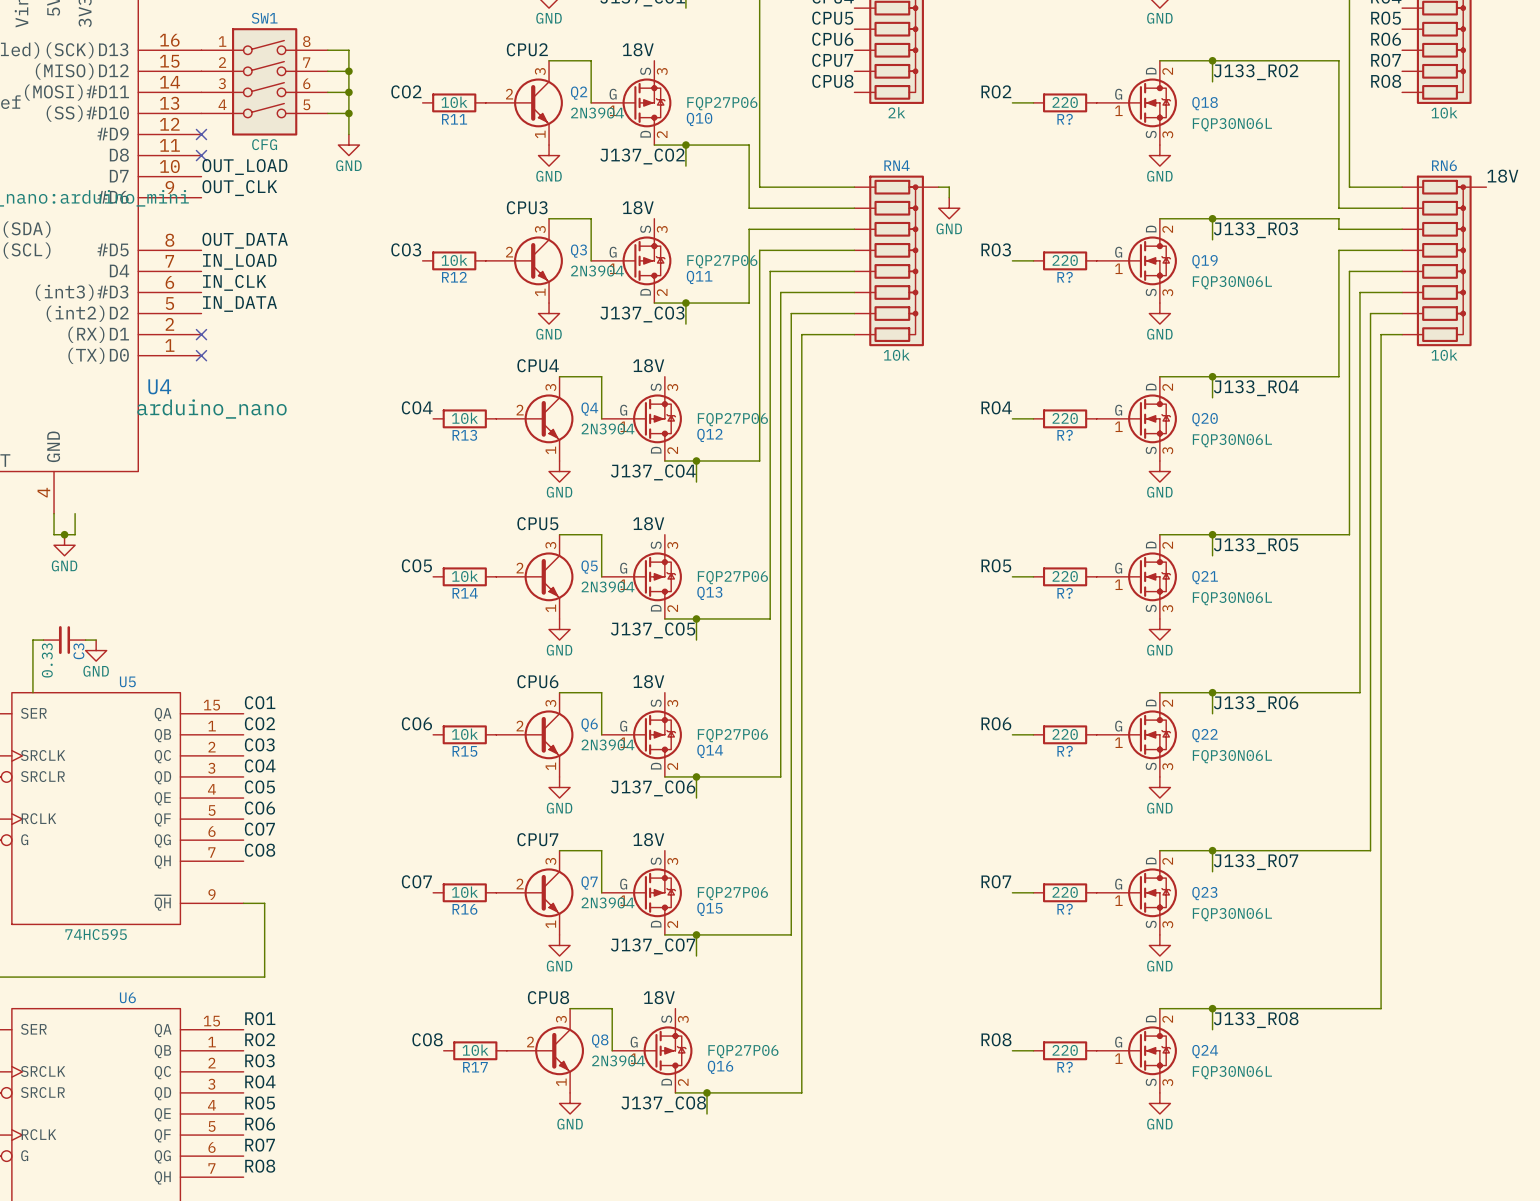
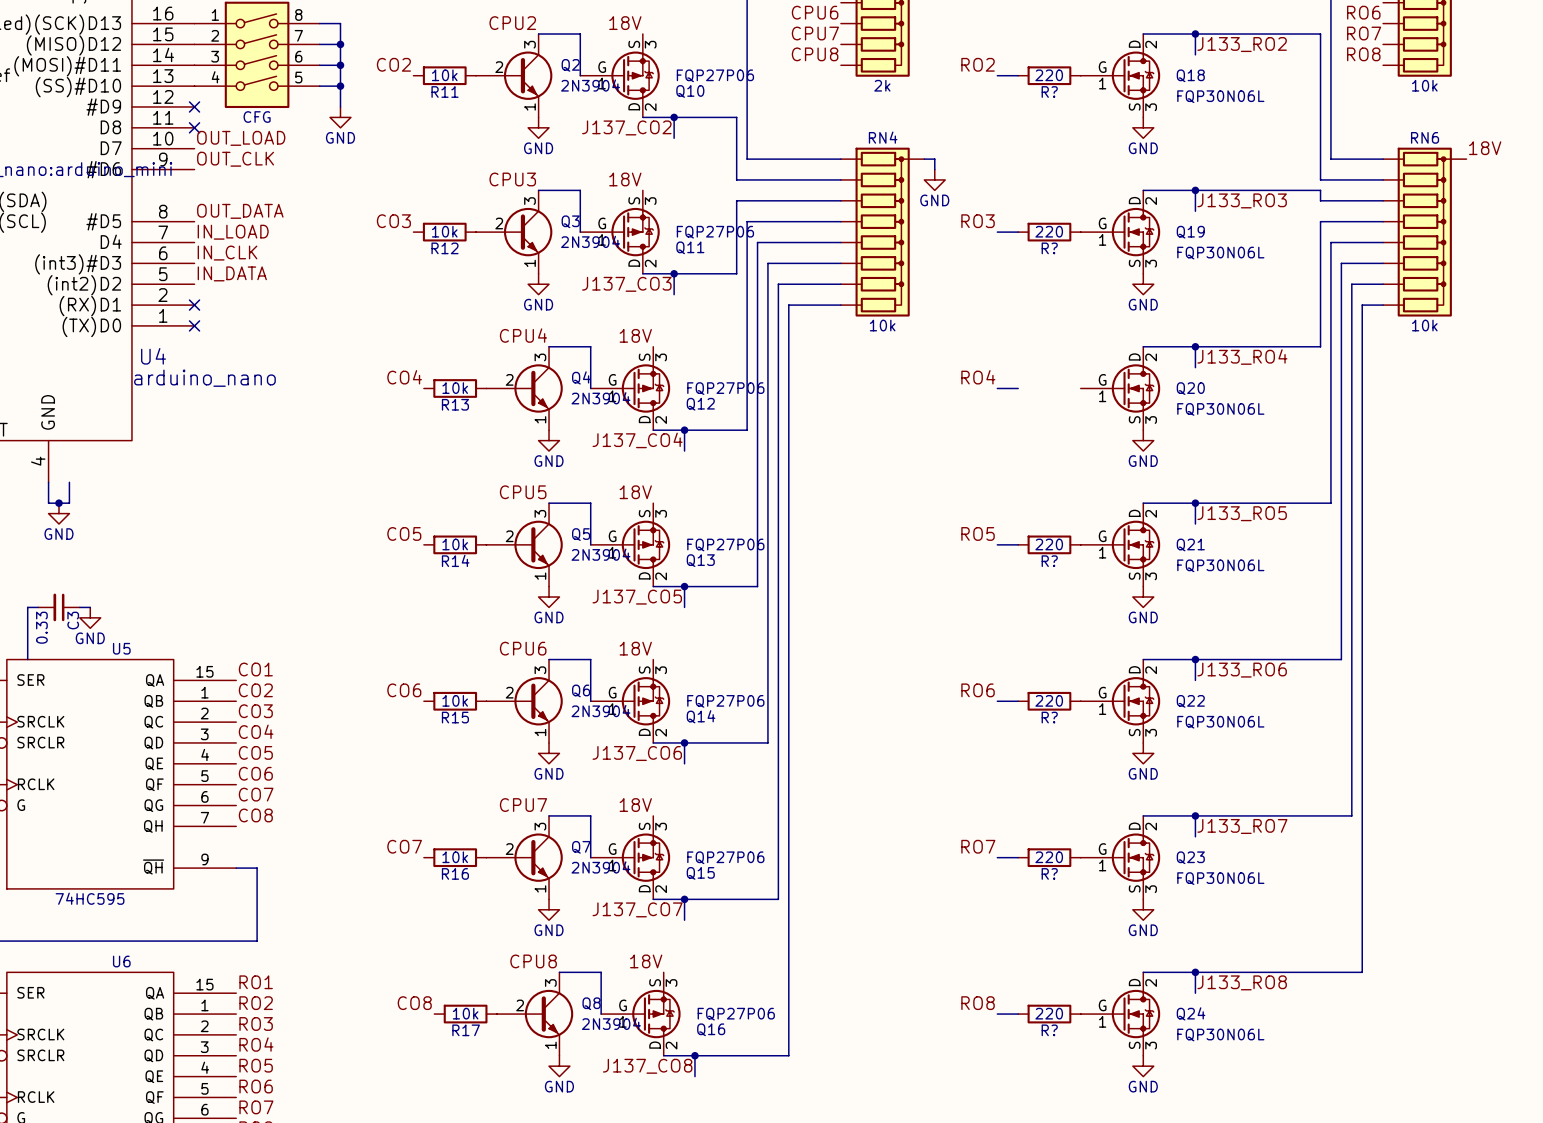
R?: 220 (1065, 418) -> none

